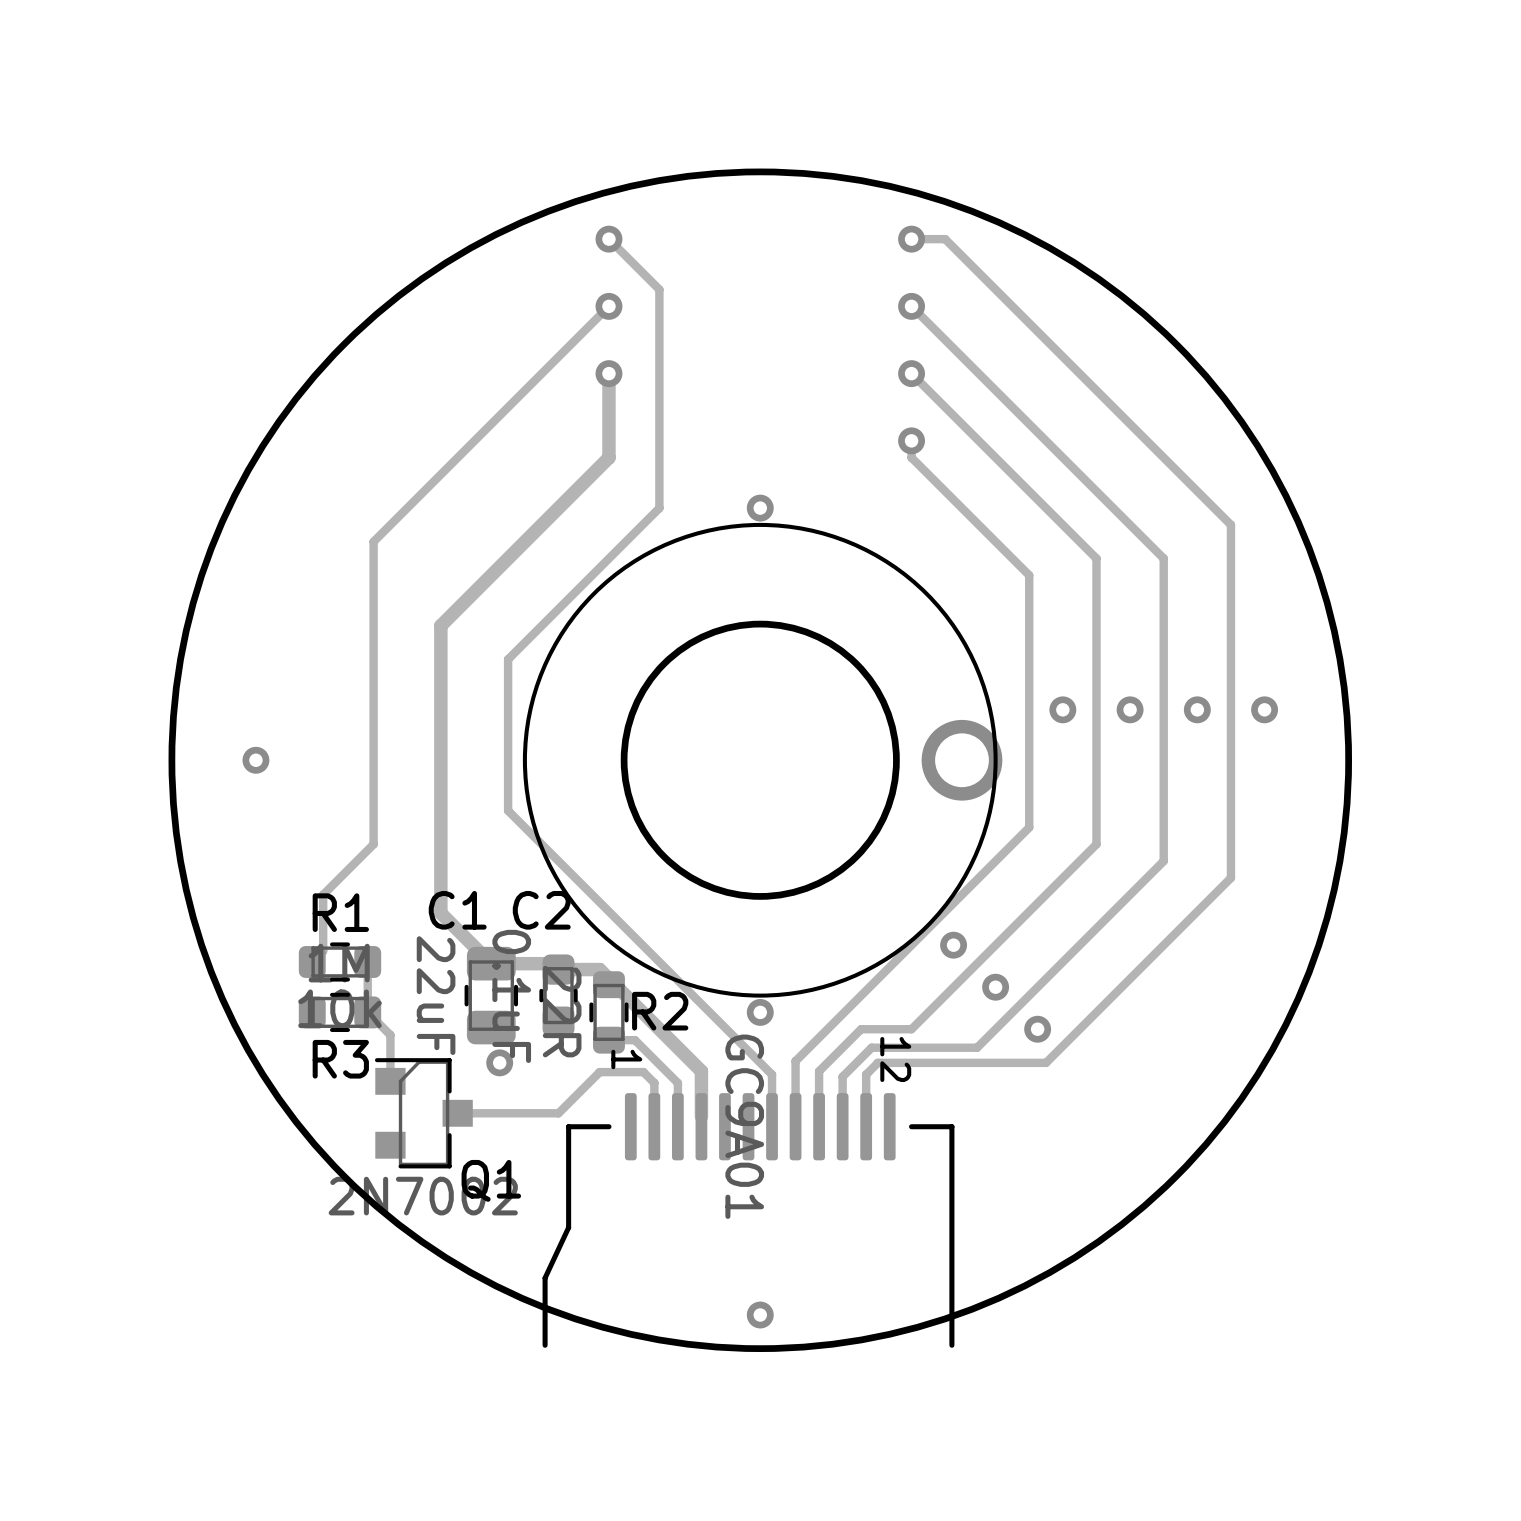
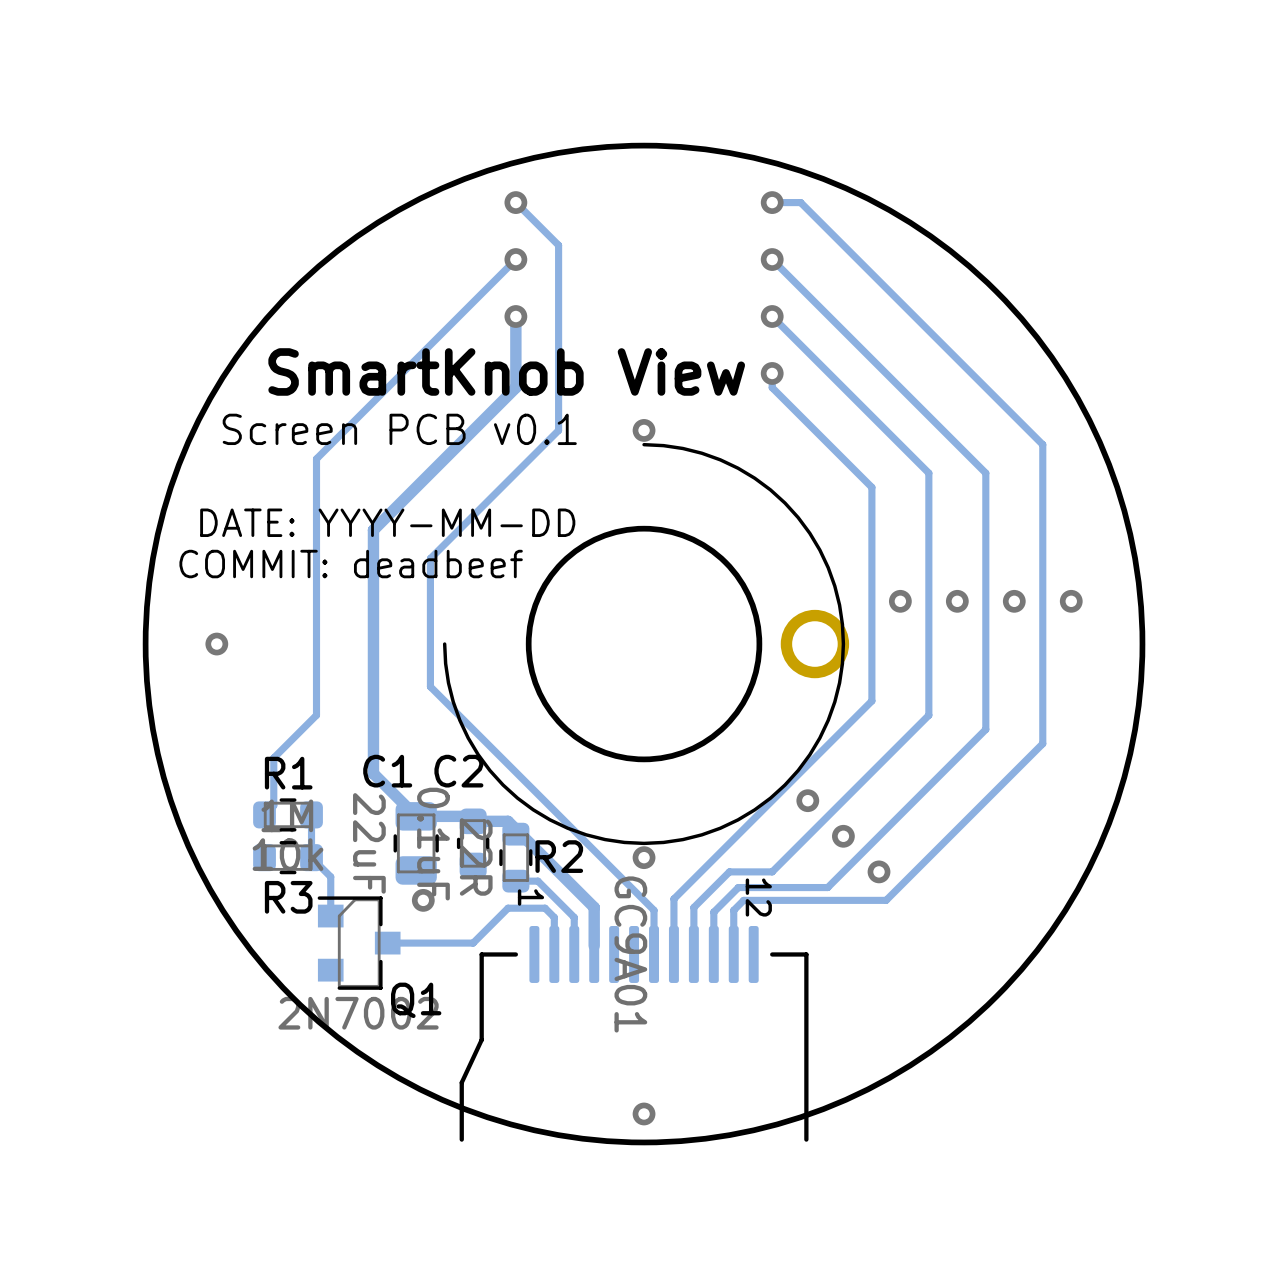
text: none -> SmartKnob View (506, 371)
text: none -> Screen PCB v0.1 (399, 429)
drawing: [522, 522, 998, 998] -> none
line: none -> (644, 444) (663, 445) (701, 453) (720, 459) (754, 478) (770, 489) (798, 517) (809, 533) (828, 567) (834, 586) (842, 624) (842, 663) (839, 682) (828, 720) (819, 738) (798, 770) (785, 785) (770, 798) (738, 819) (720, 828) (682, 839) (663, 842) (624, 842) (586, 834) (567, 828) (533, 809) (517, 798) (489, 770) (478, 754) (459, 720) (453, 701) (445, 663) (444, 644)
text: none -> DATE: YYYY-MM-DD (387, 522)
text: none -> COMMIT: deadbeef (351, 564)

